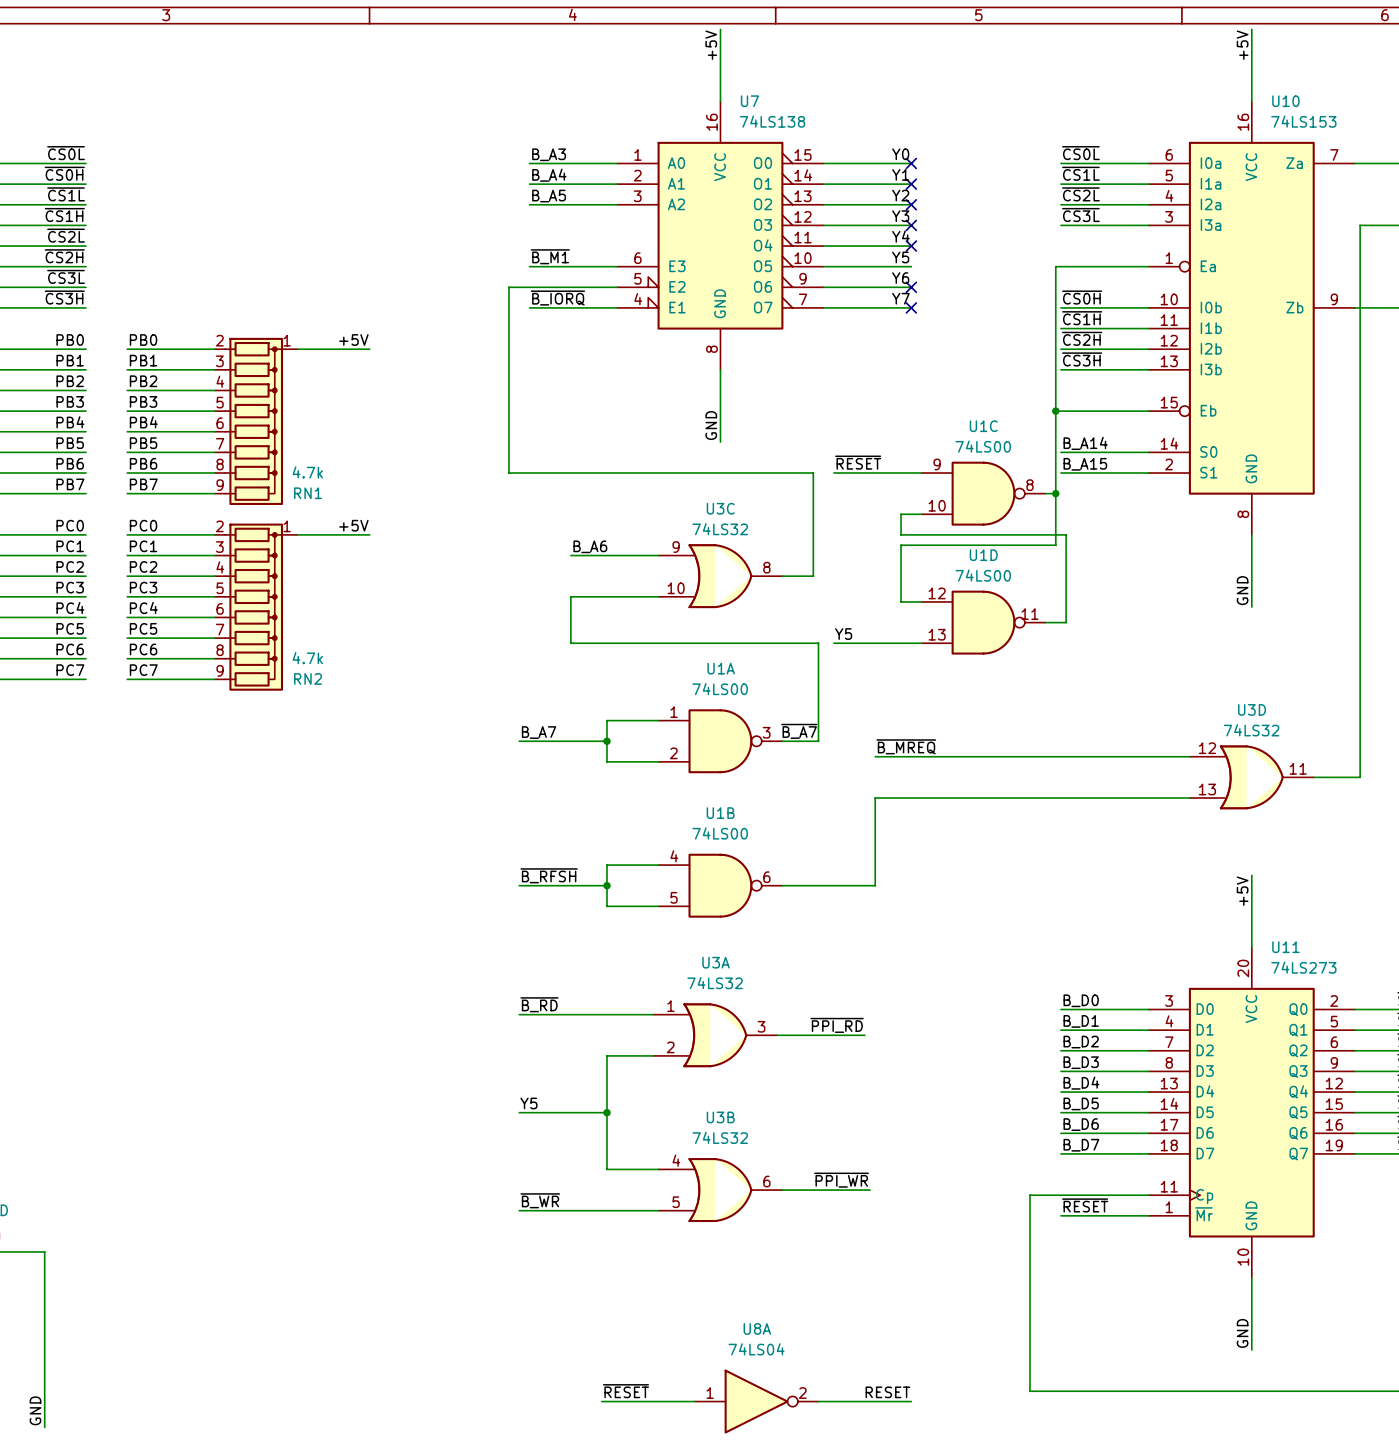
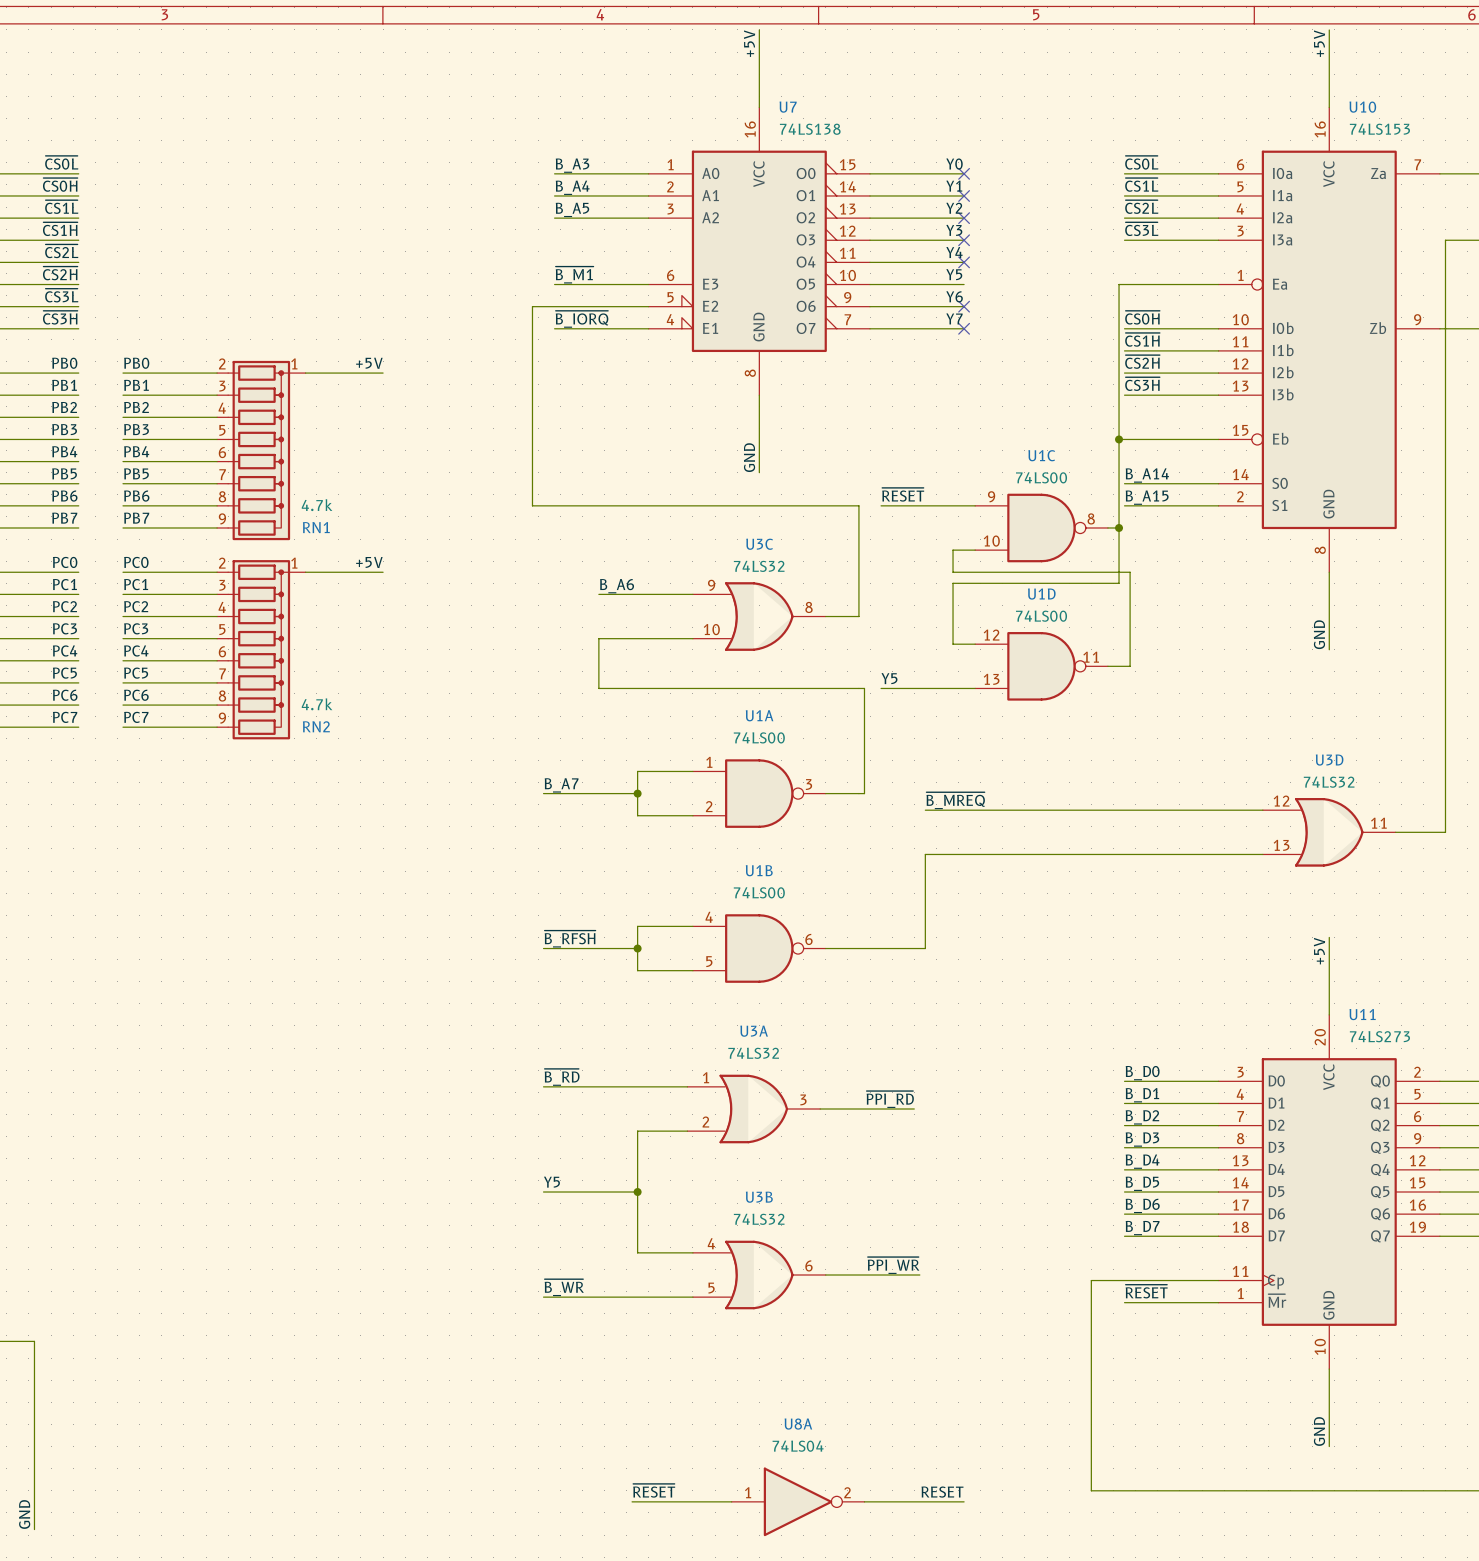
label: ~{B_A7} (799, 731) -> none

